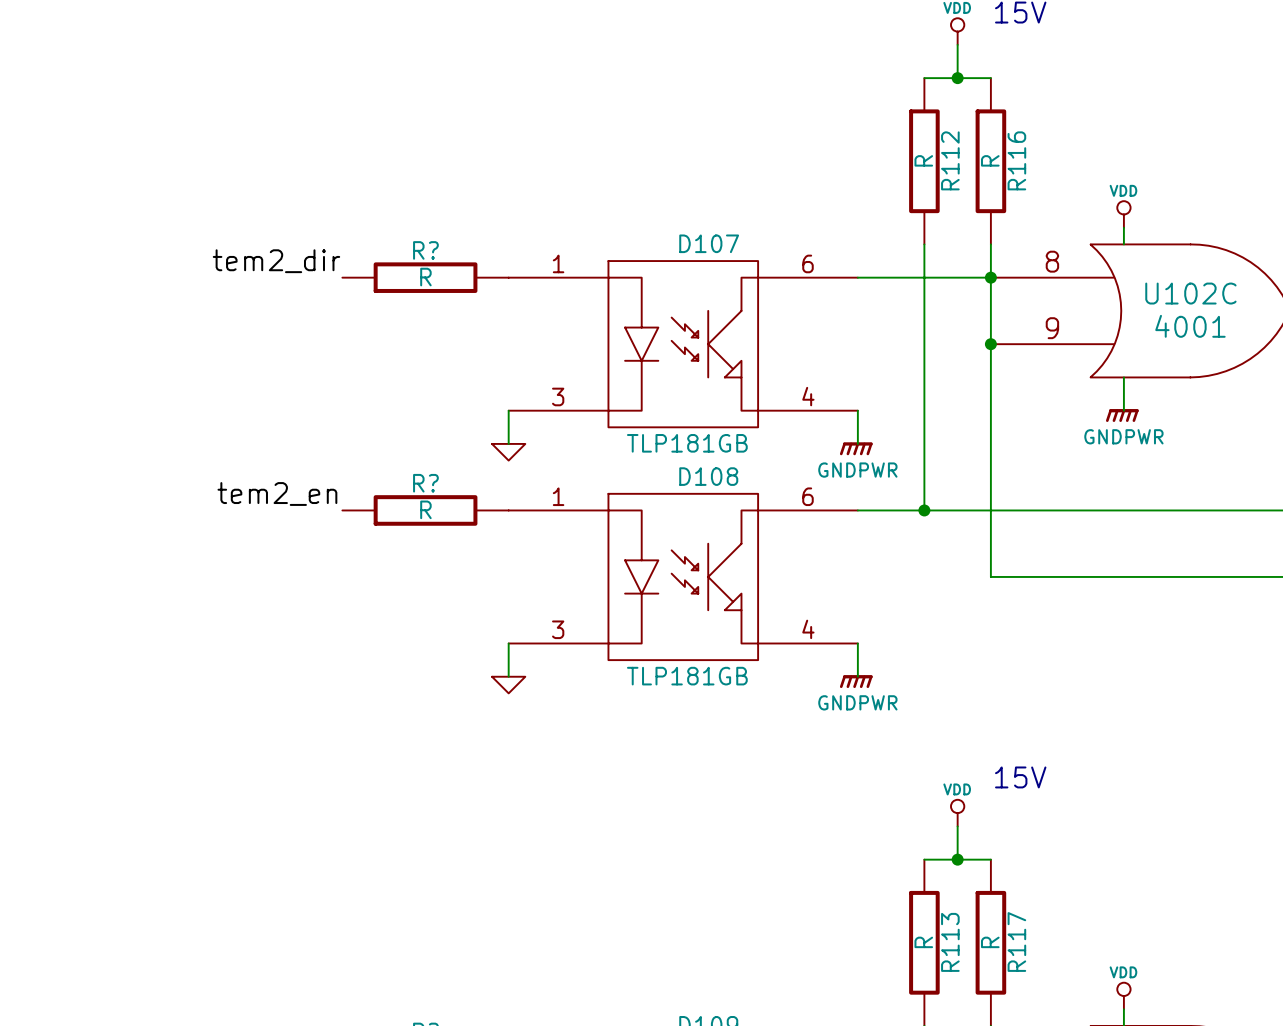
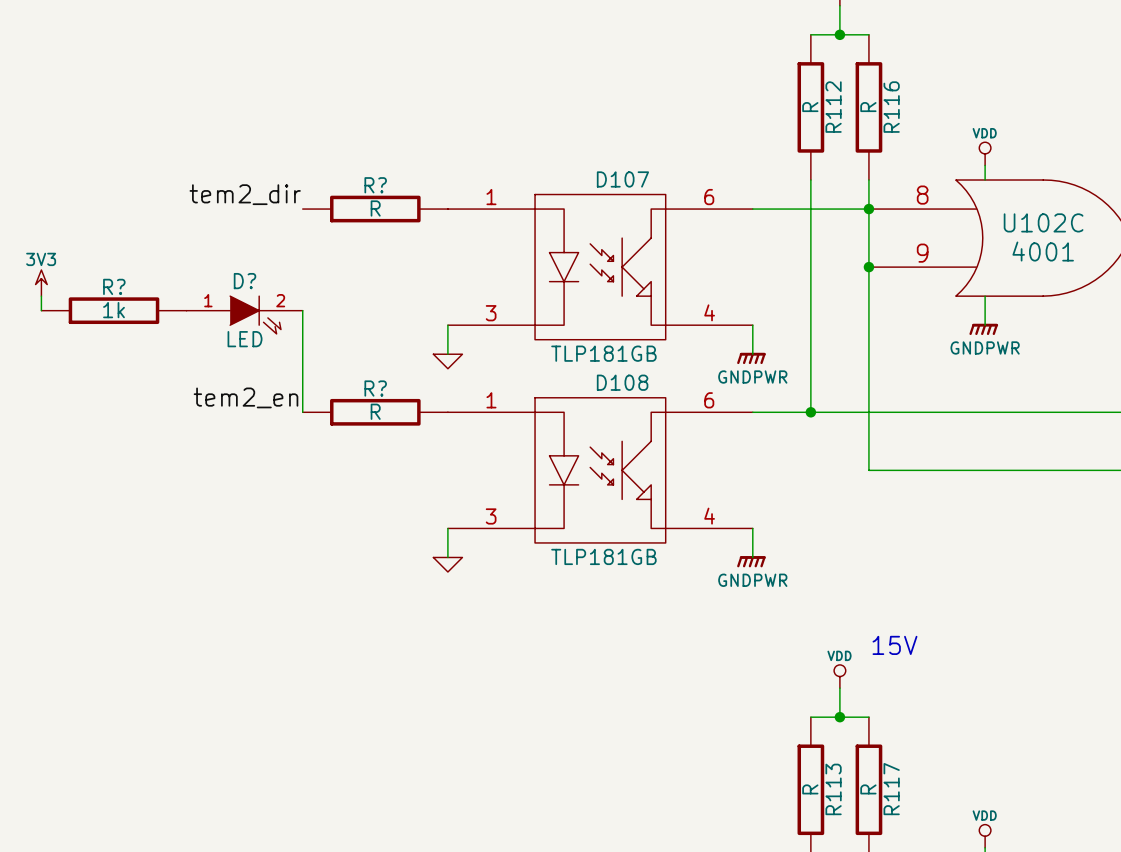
power symbol: none -> 3V3 (41, 283)
wire: none -> (41, 296) (41, 310)
R?: none -> 1k (113, 310)
wire: none -> (302, 310) (302, 412)
D?: none -> LED (244, 315)

